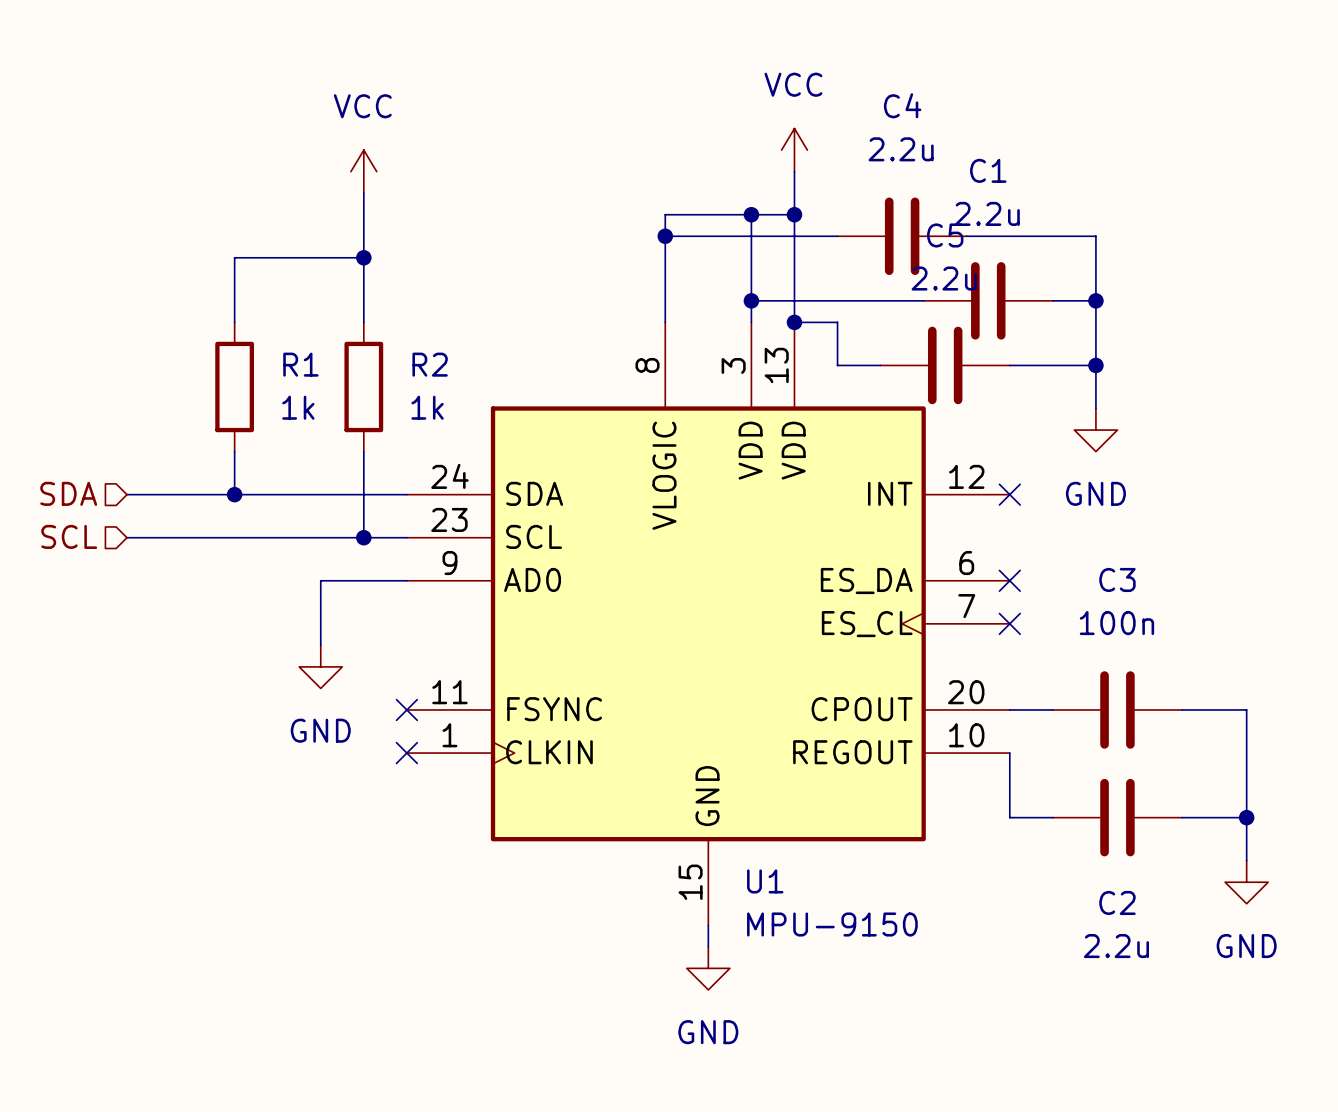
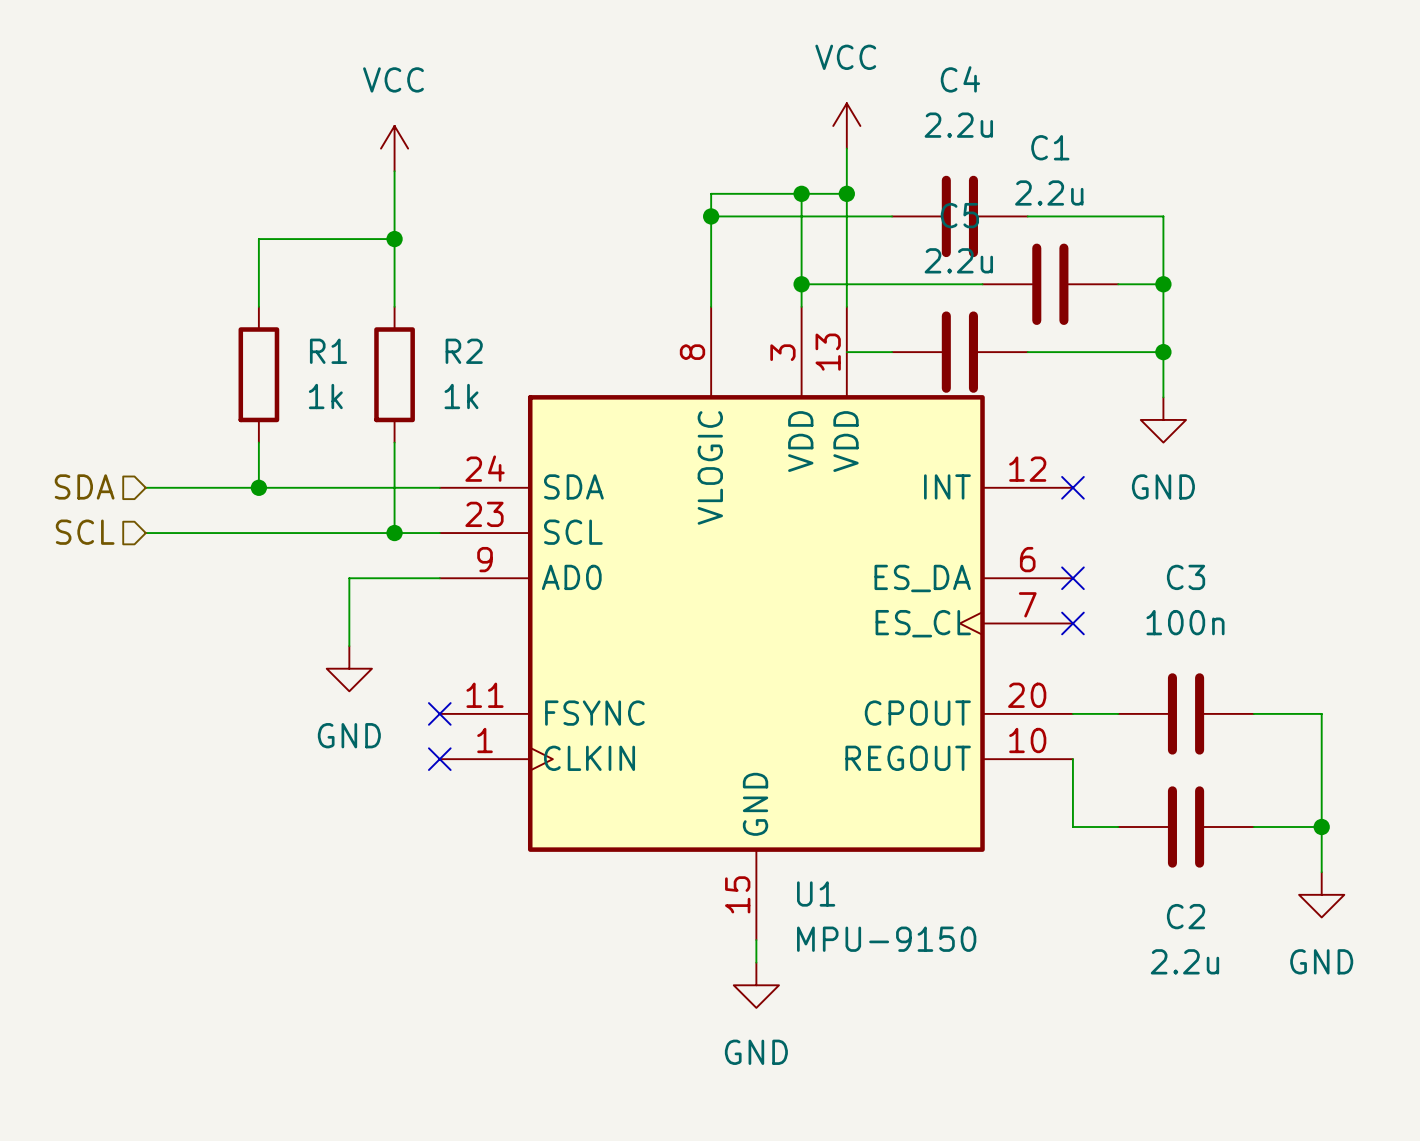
wire: (794, 322) (837, 322) (837, 365) (880, 365) -> none
junction: (794, 322) -> none
wire: none -> (846, 352) (892, 352)
C5 position: (945, 365) -> (959, 352)

